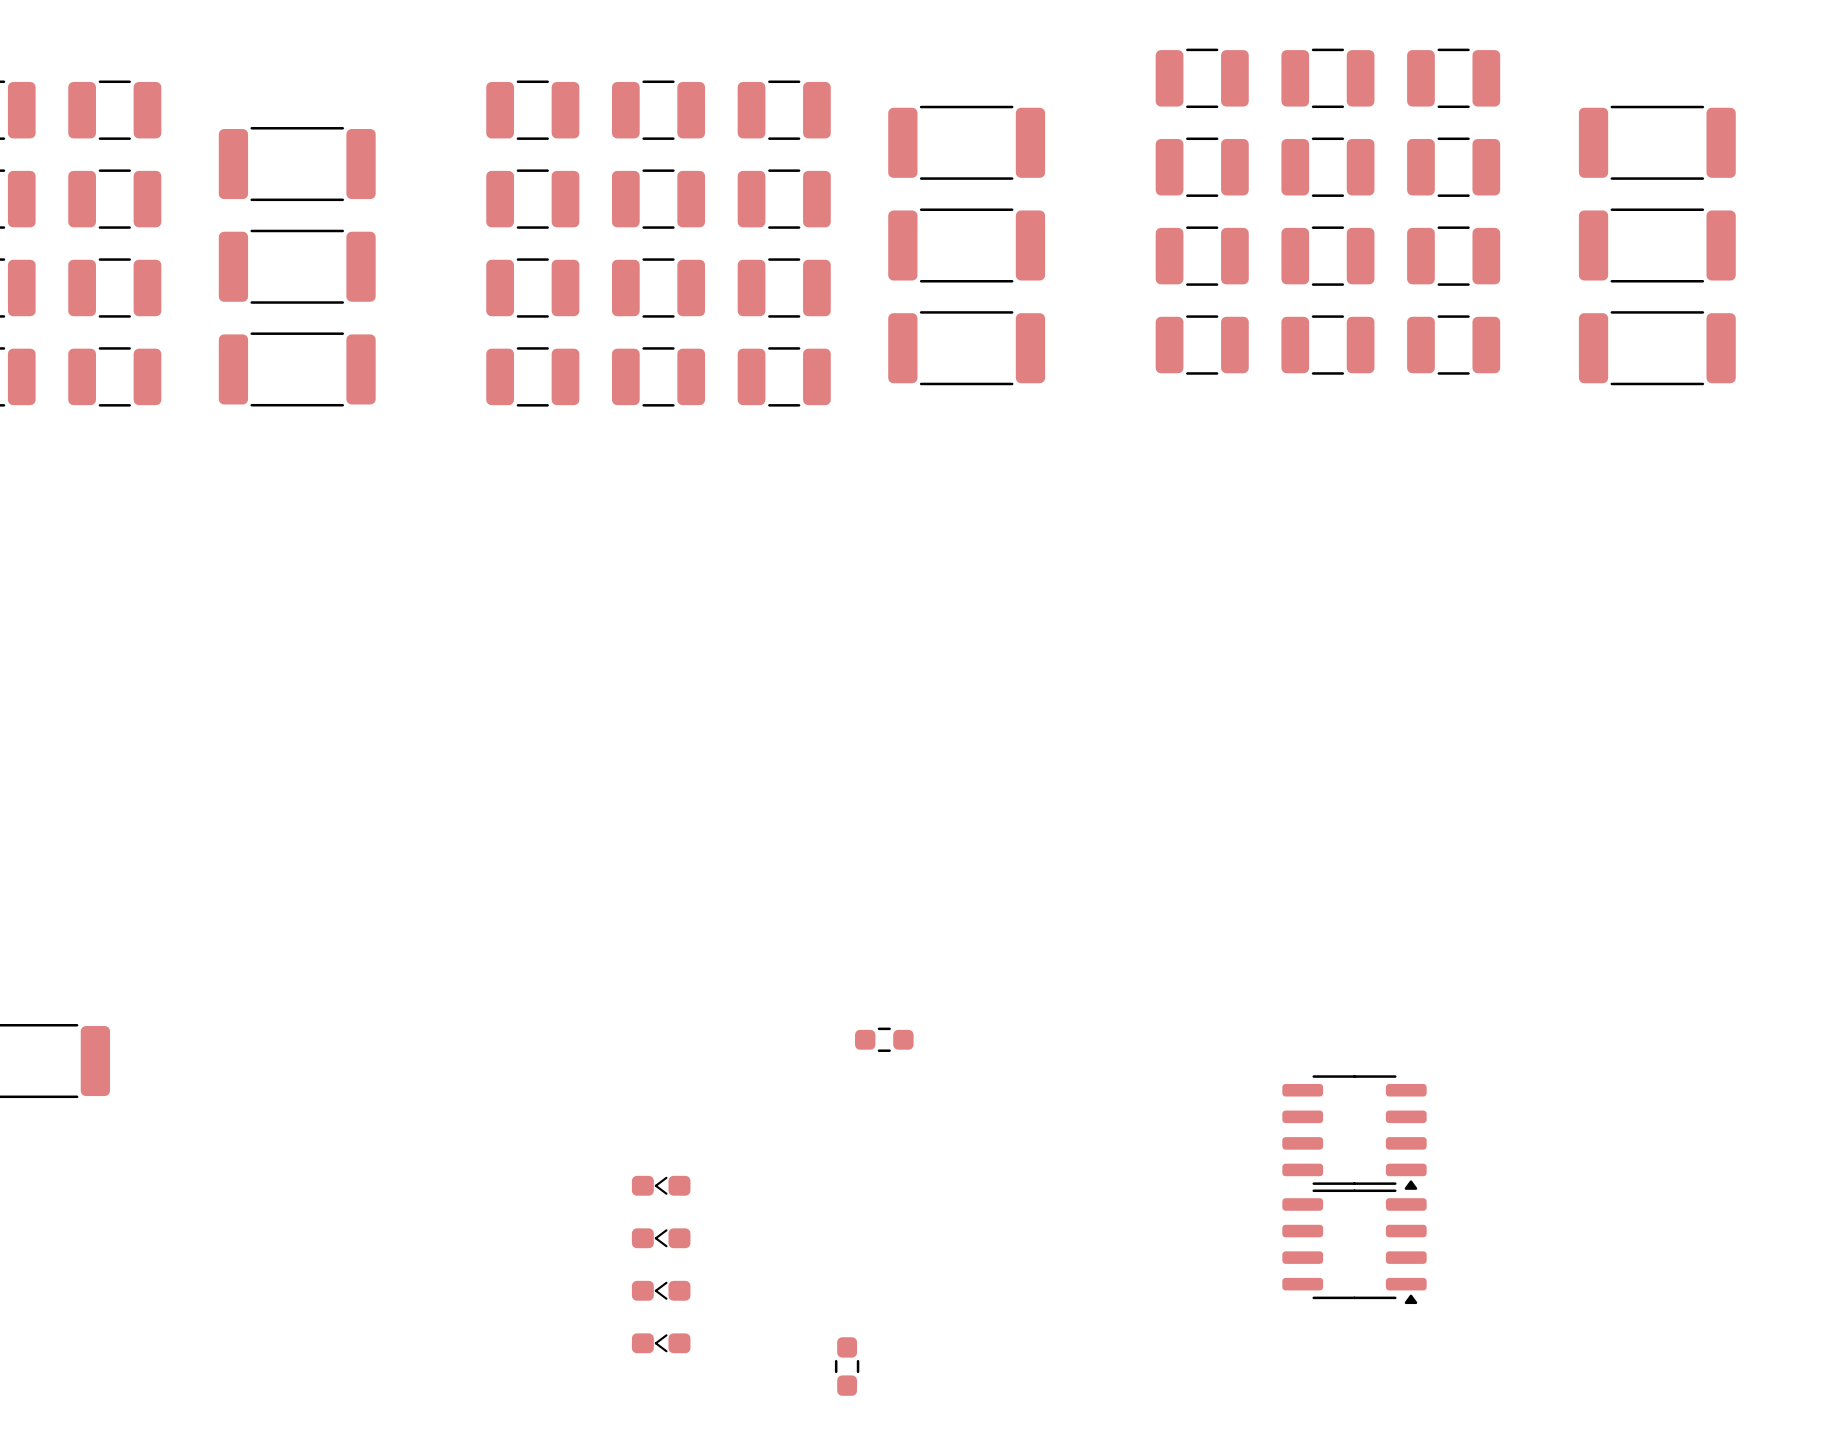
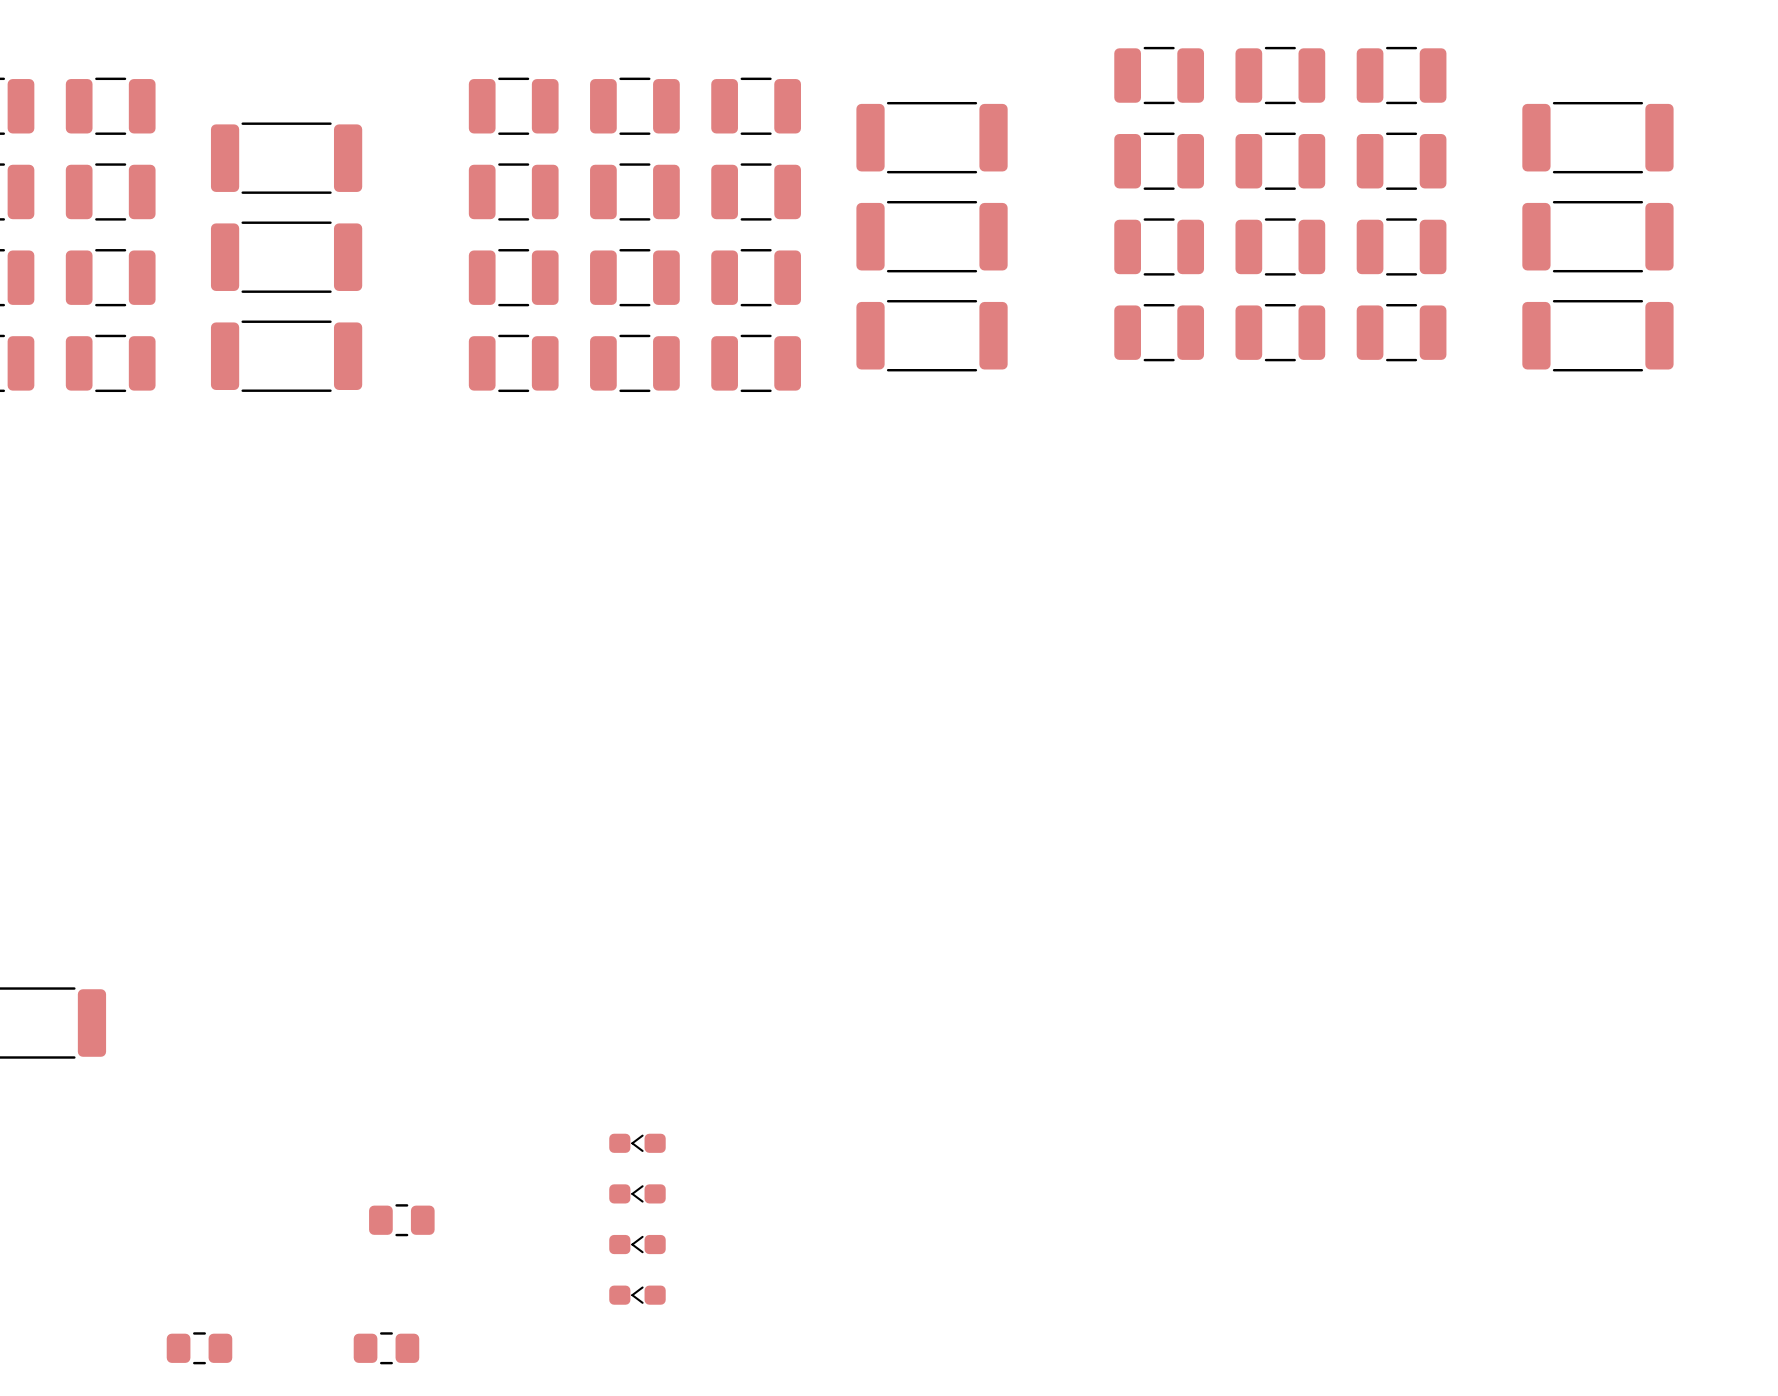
part: (884, 1039) -> none
part: (1354, 1132) -> none
part: (1354, 1246) -> none
part: none -> (401, 1220)
part: (847, 1366) -> none
part: none -> (199, 1348)
part: none -> (386, 1348)

